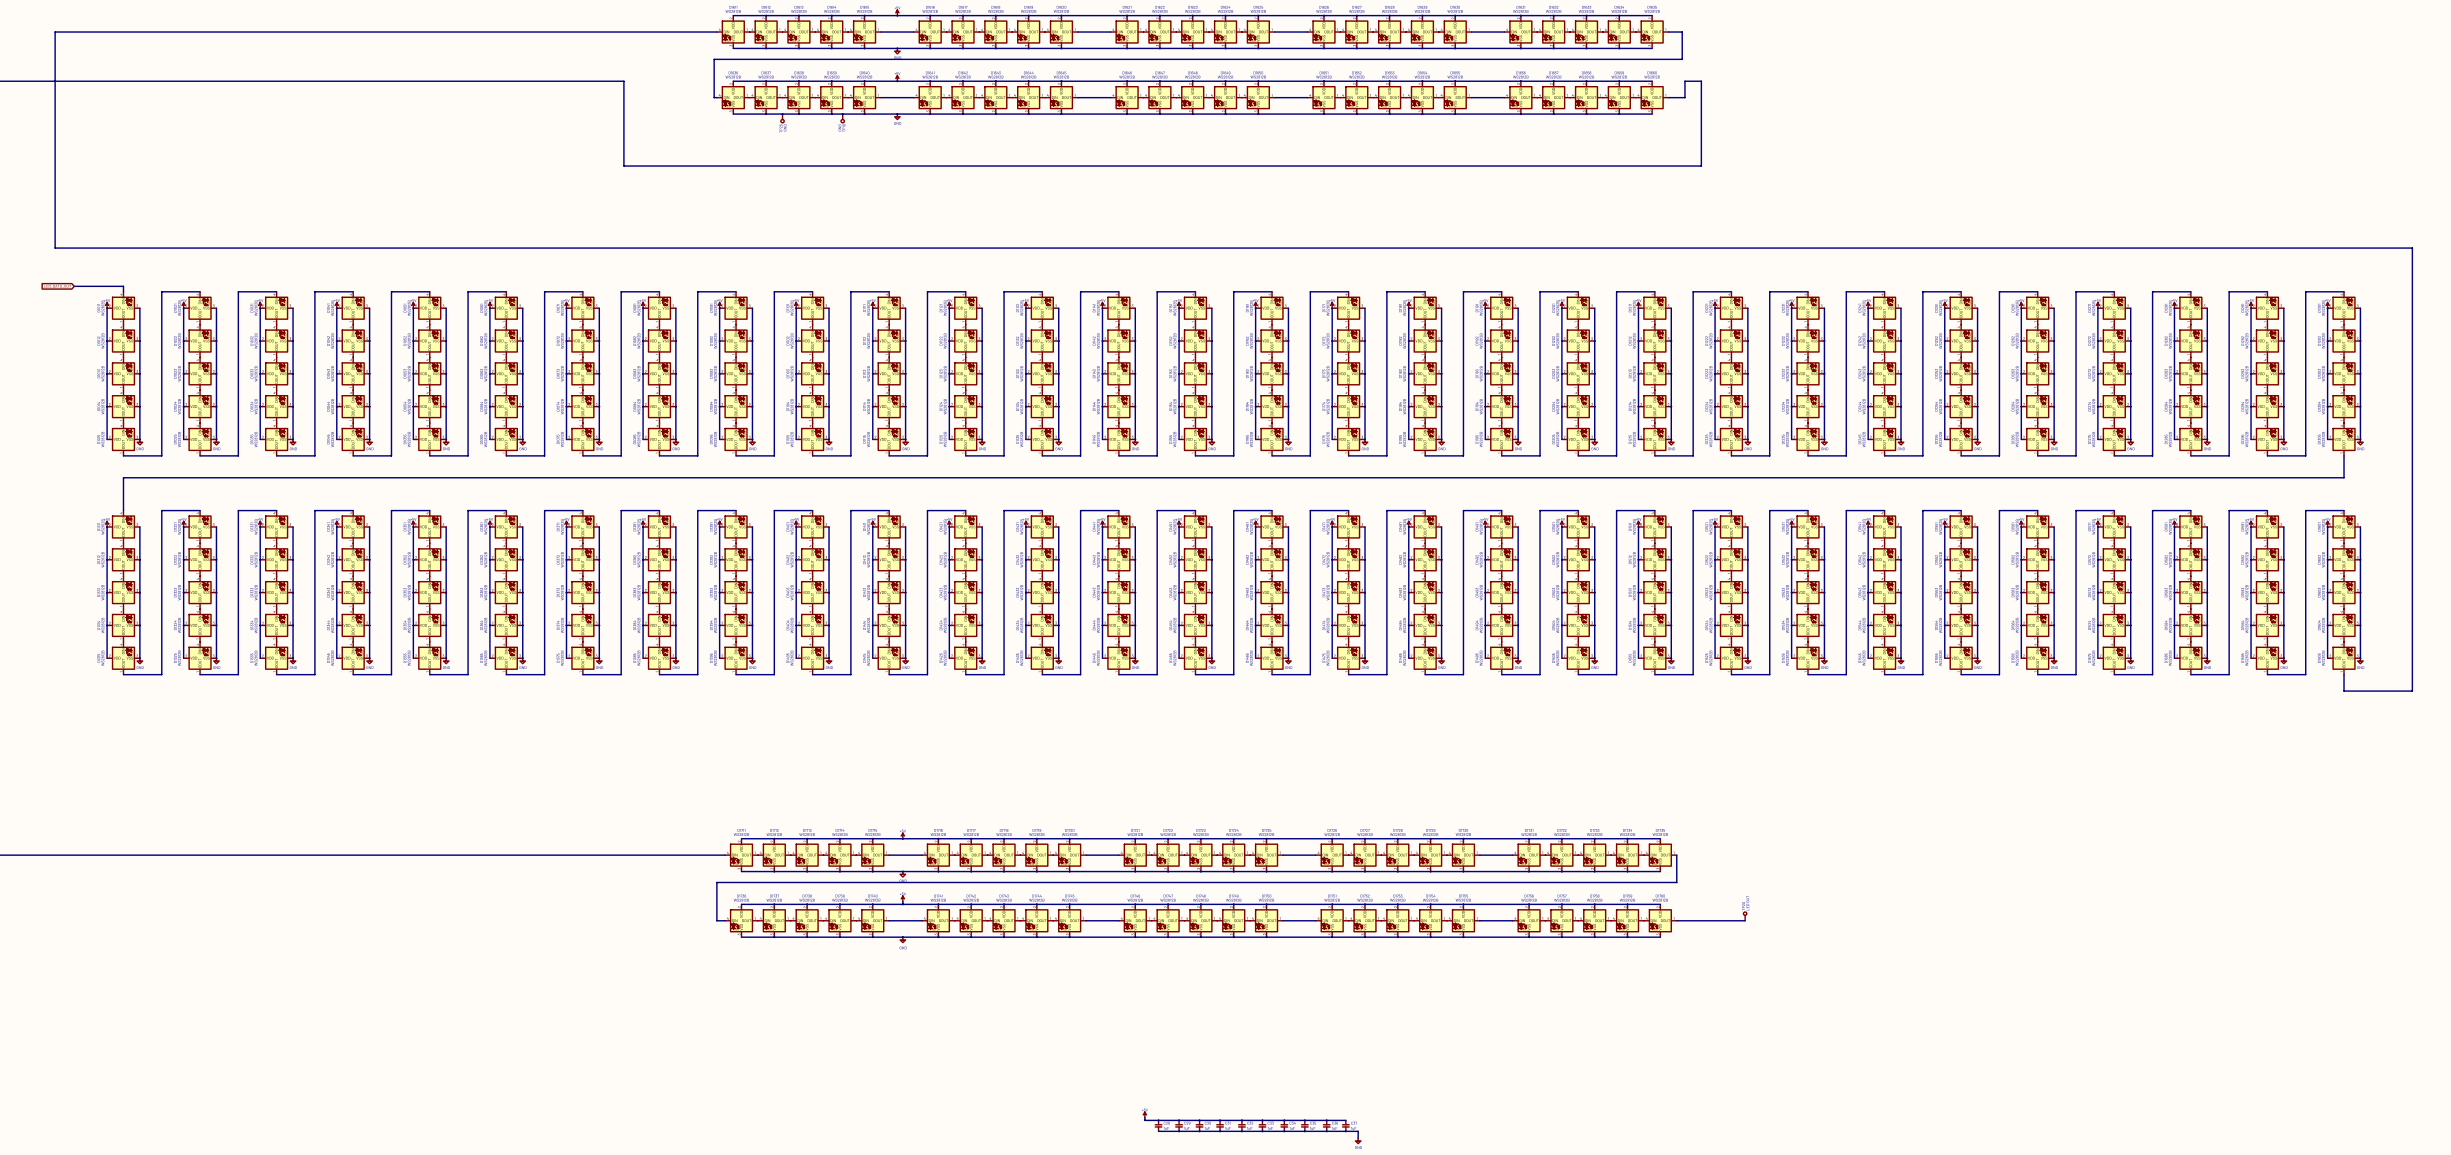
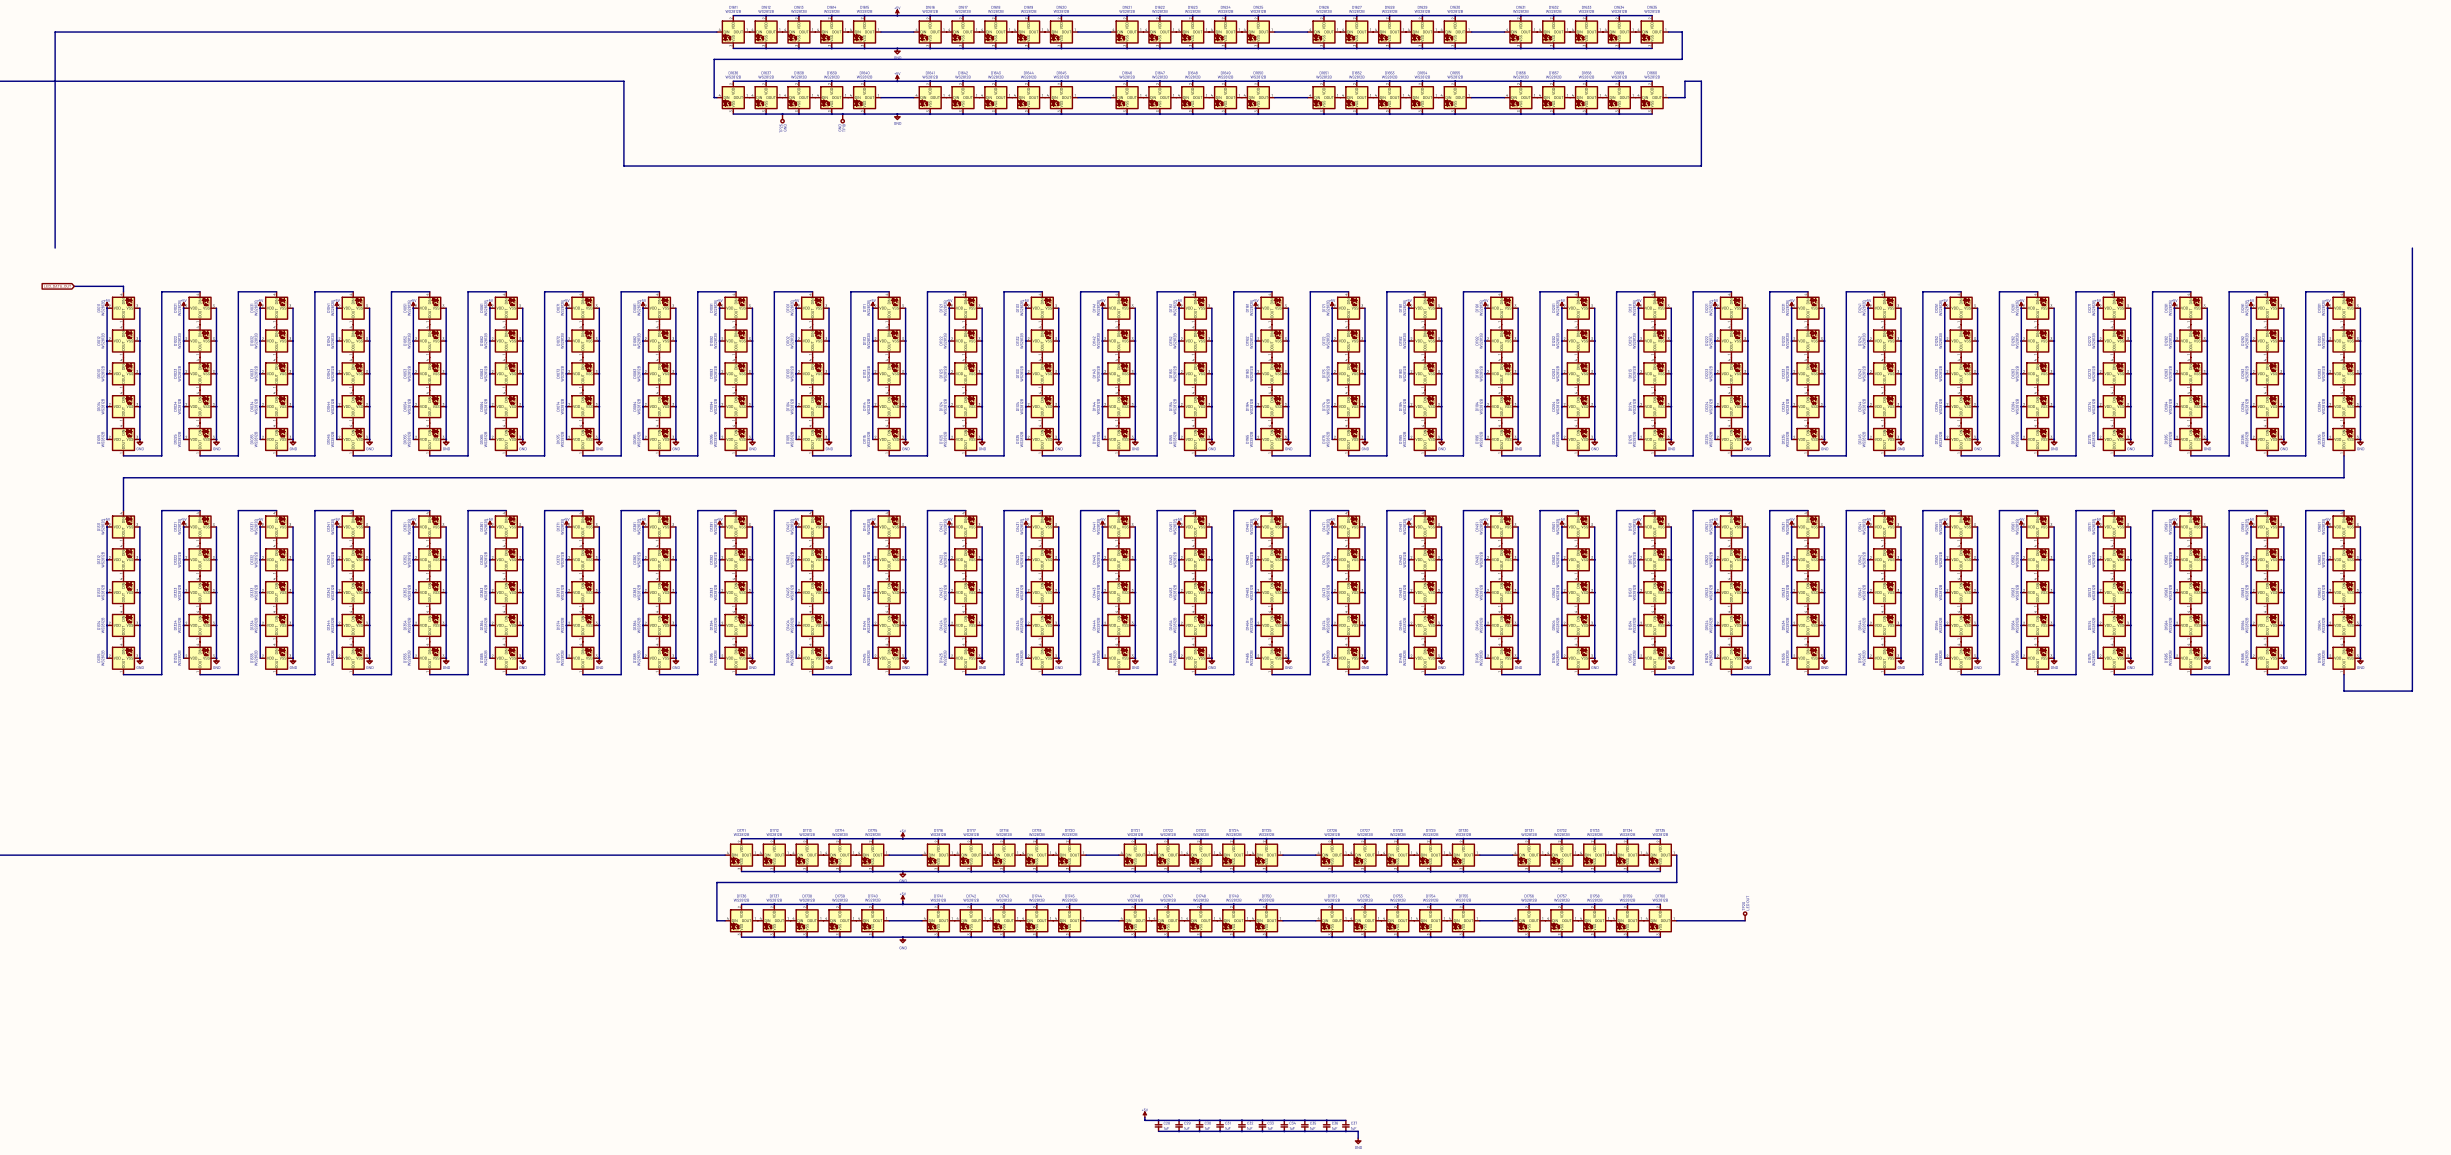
wire: (55, 248) (2412, 248) -> none

